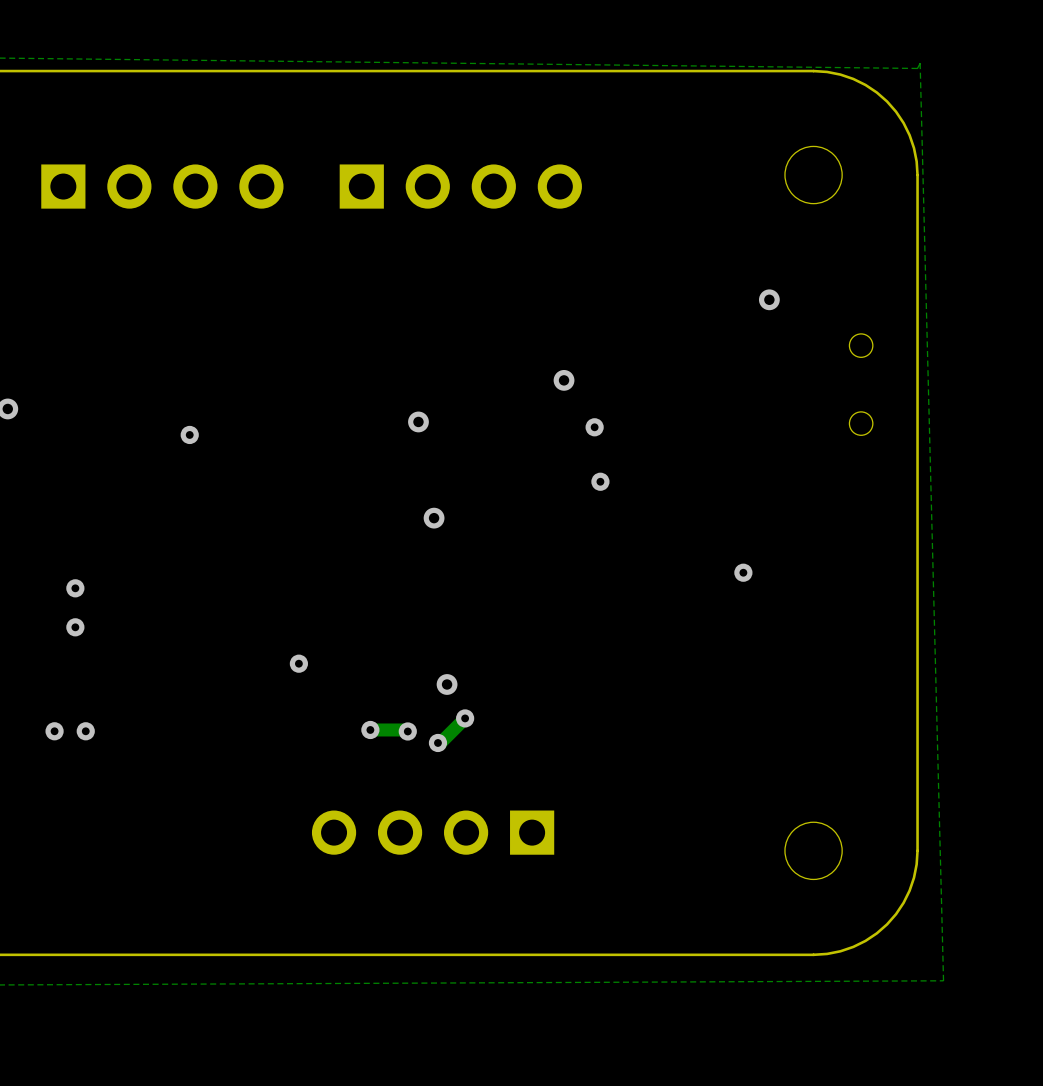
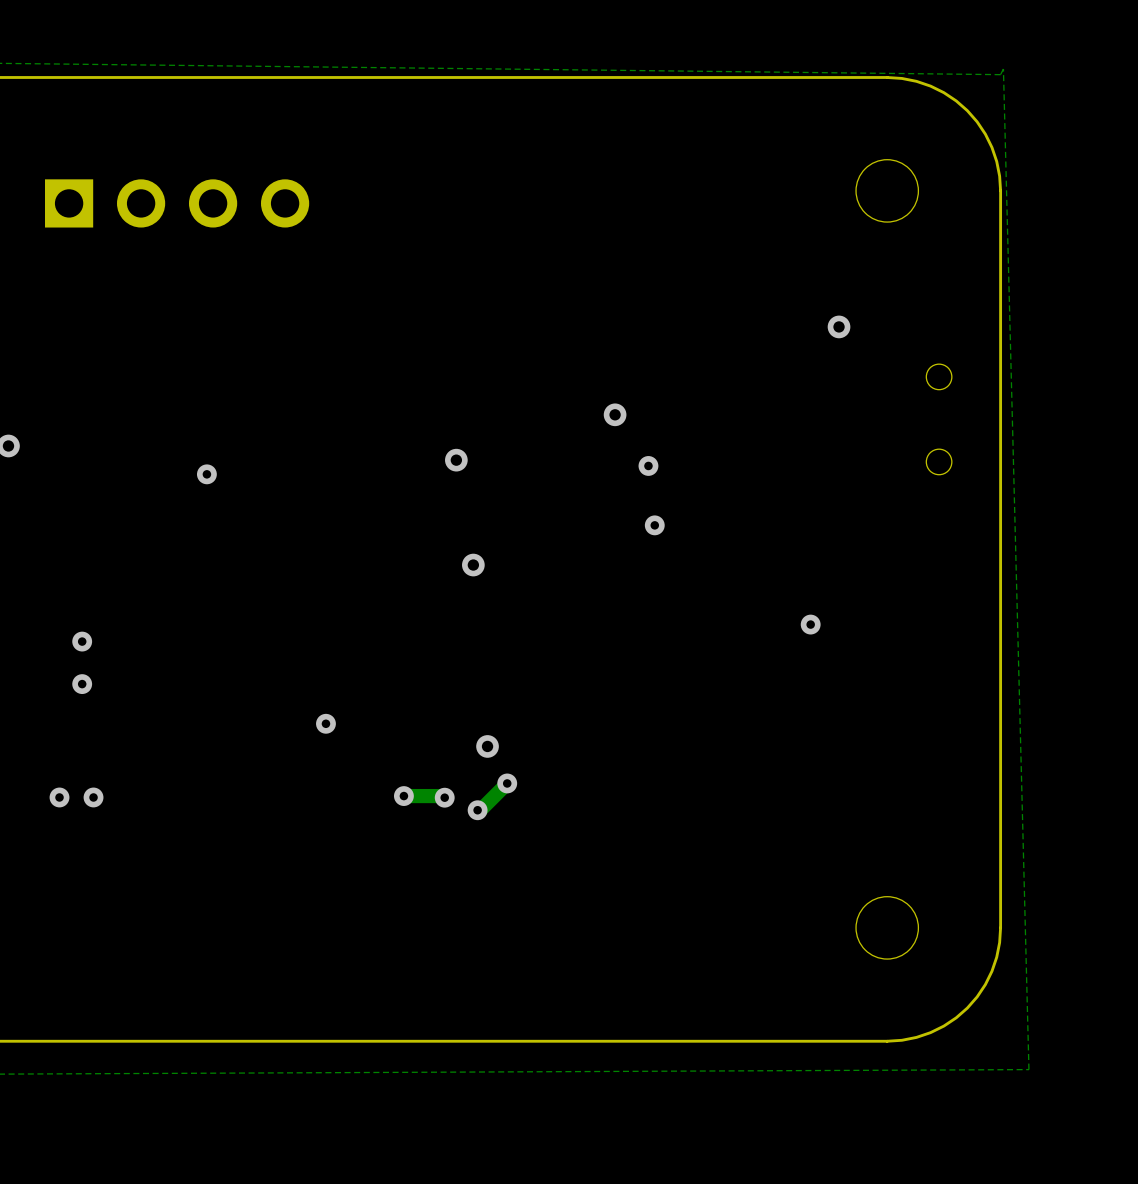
part: (460, 186) -> none
part: (433, 832) -> none

